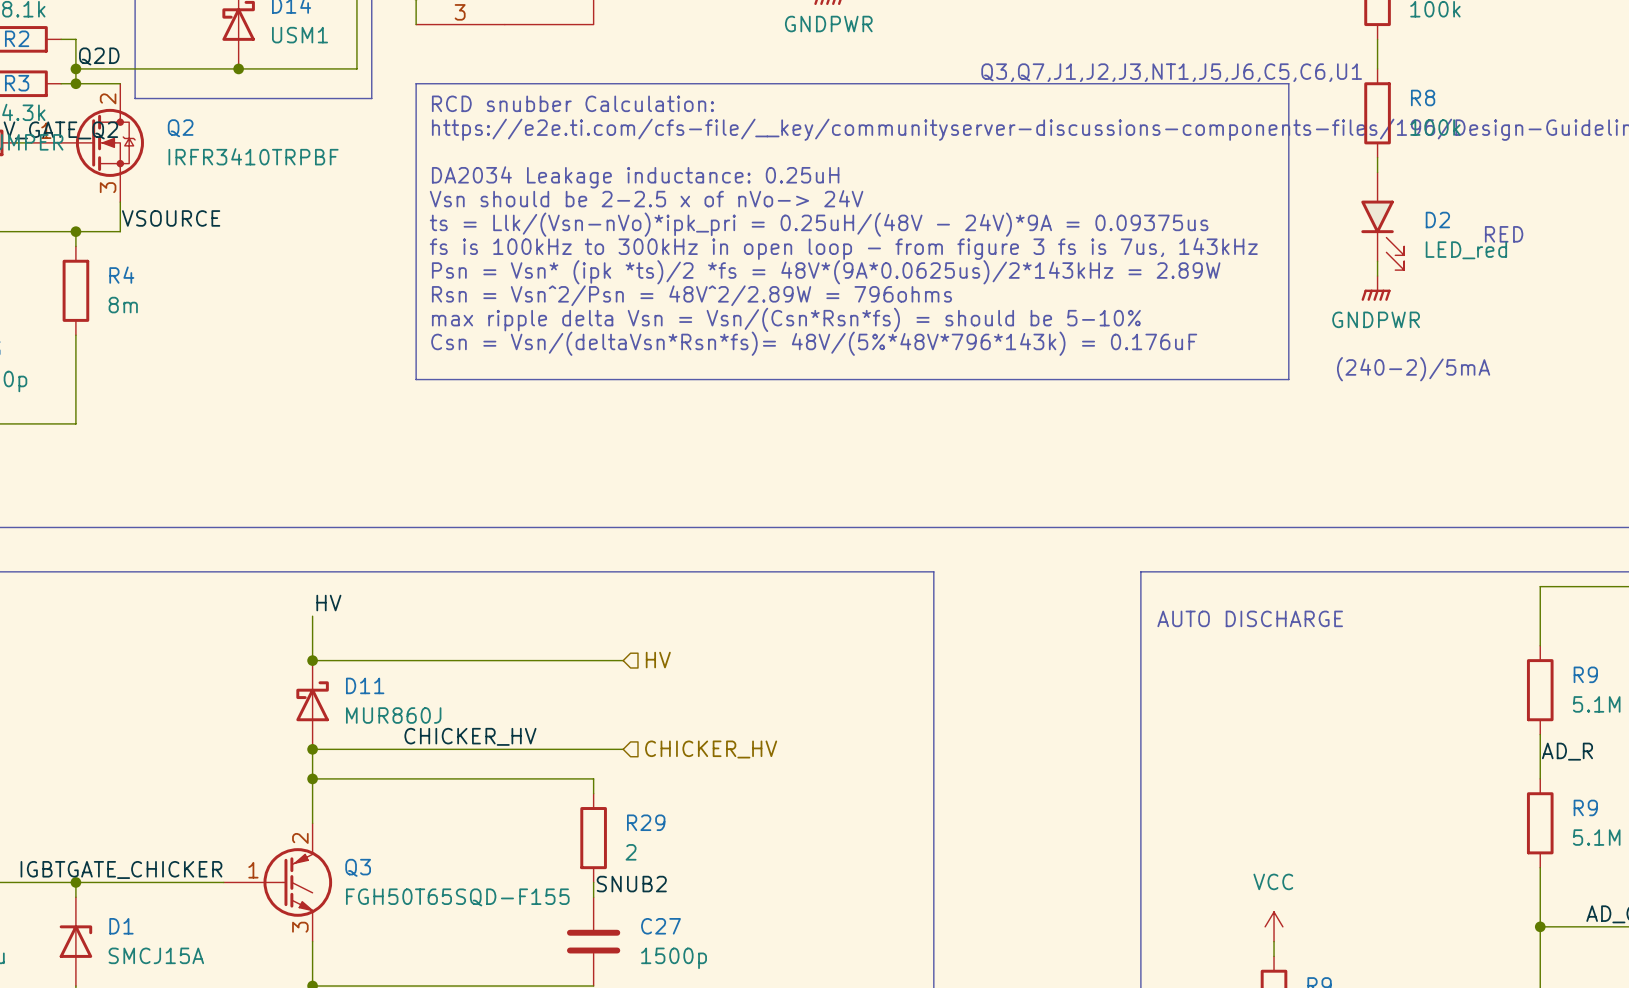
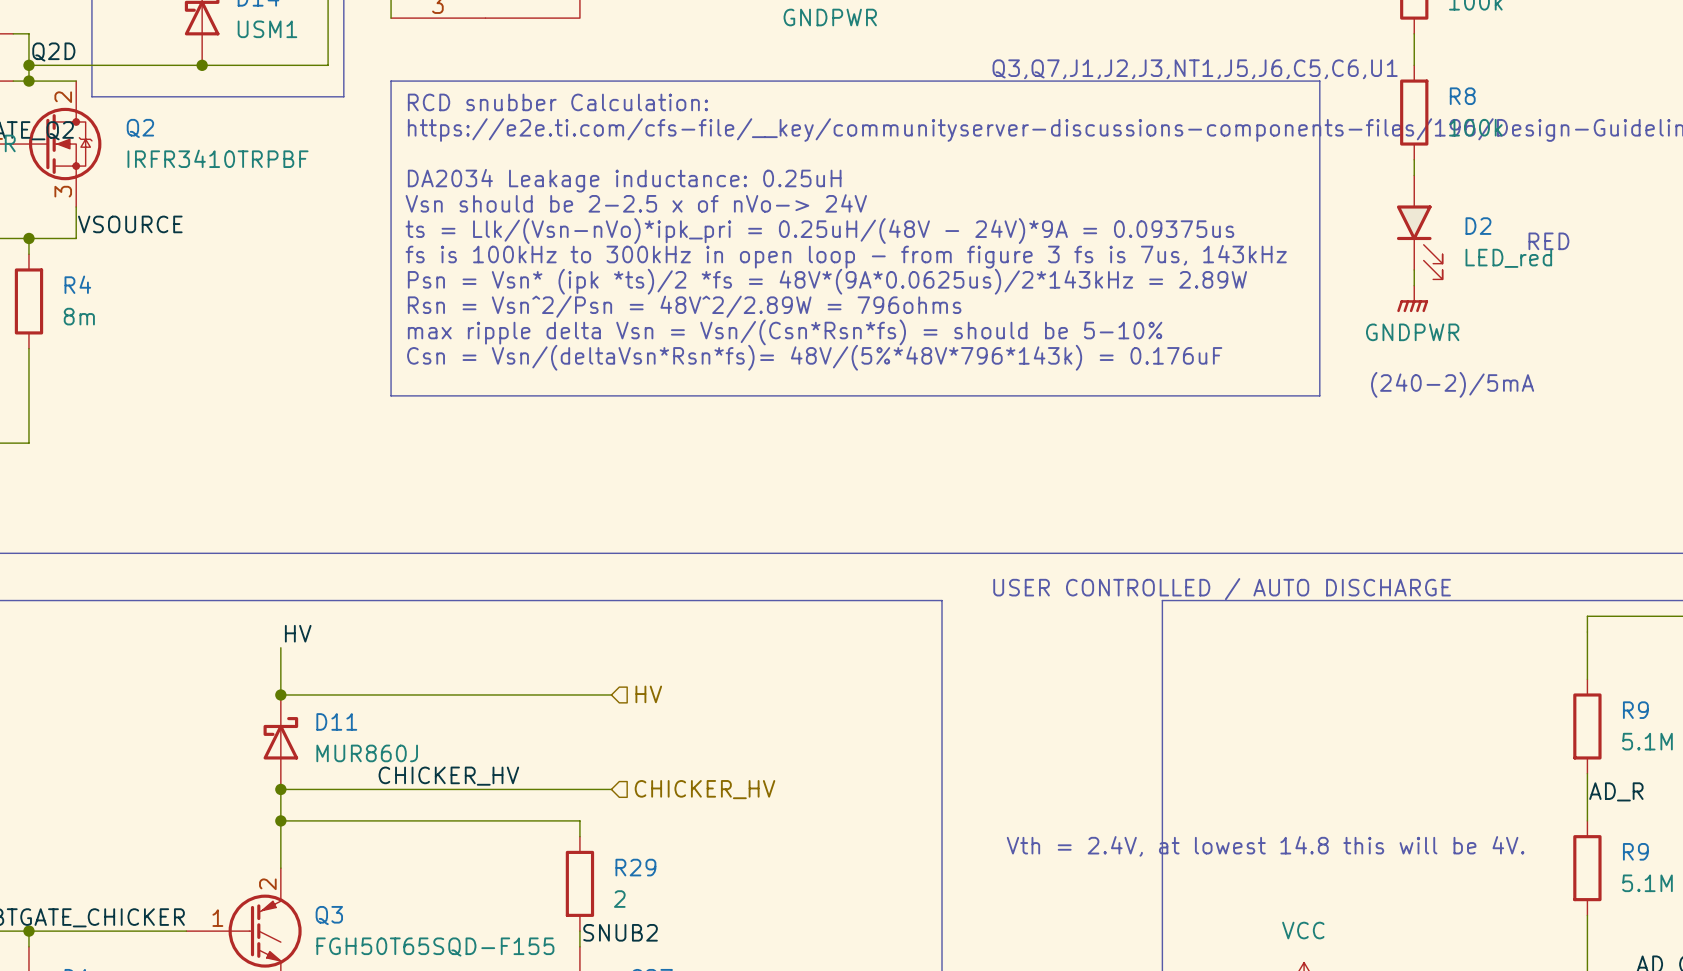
text: none -> USER CONTROLLED / AUTO DISCHARGE (1222, 589)
text: AUTO DISCHARGE (1250, 618) -> none
text: none -> Vth = 2.4V, at lowest 14.8 this will be 4V. (1265, 846)

